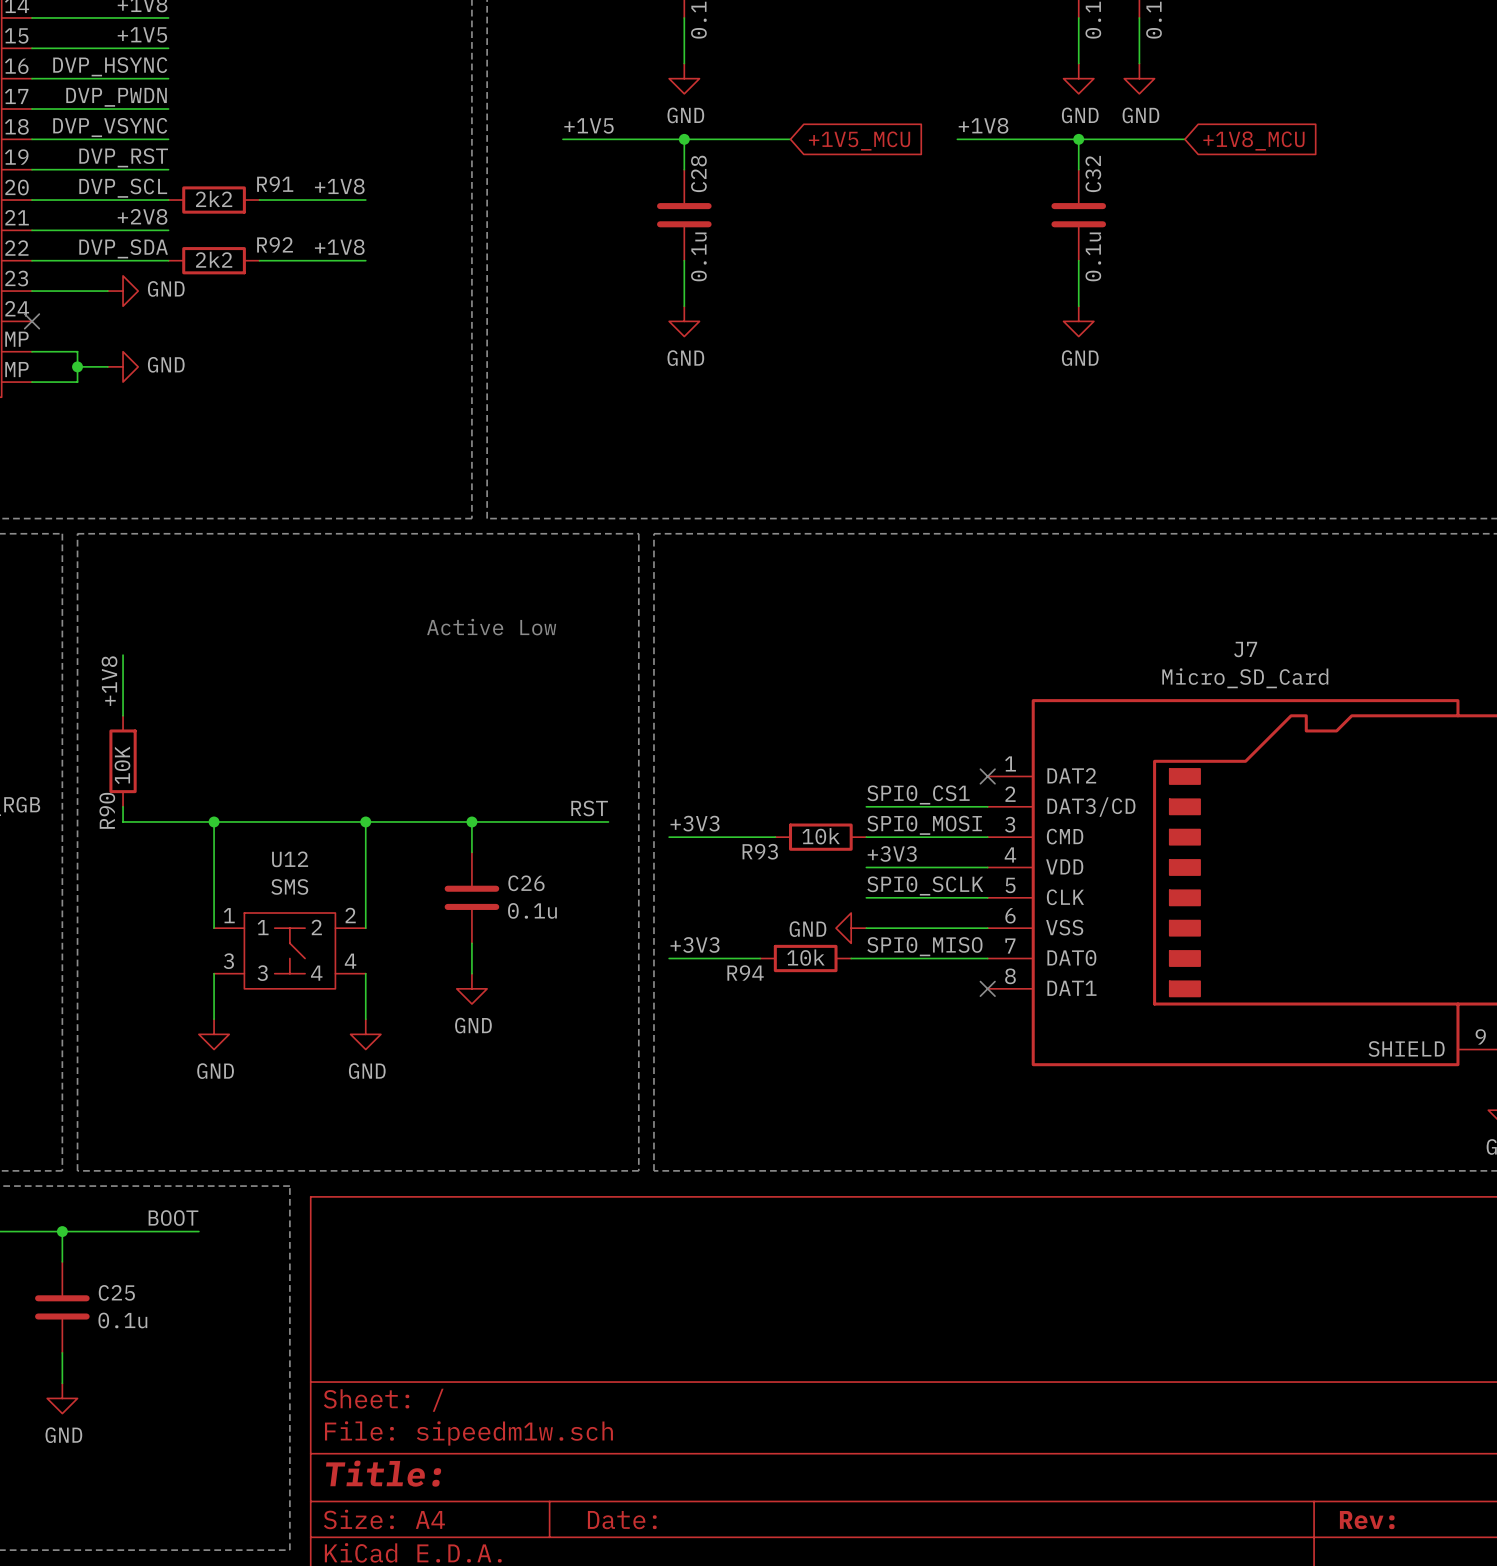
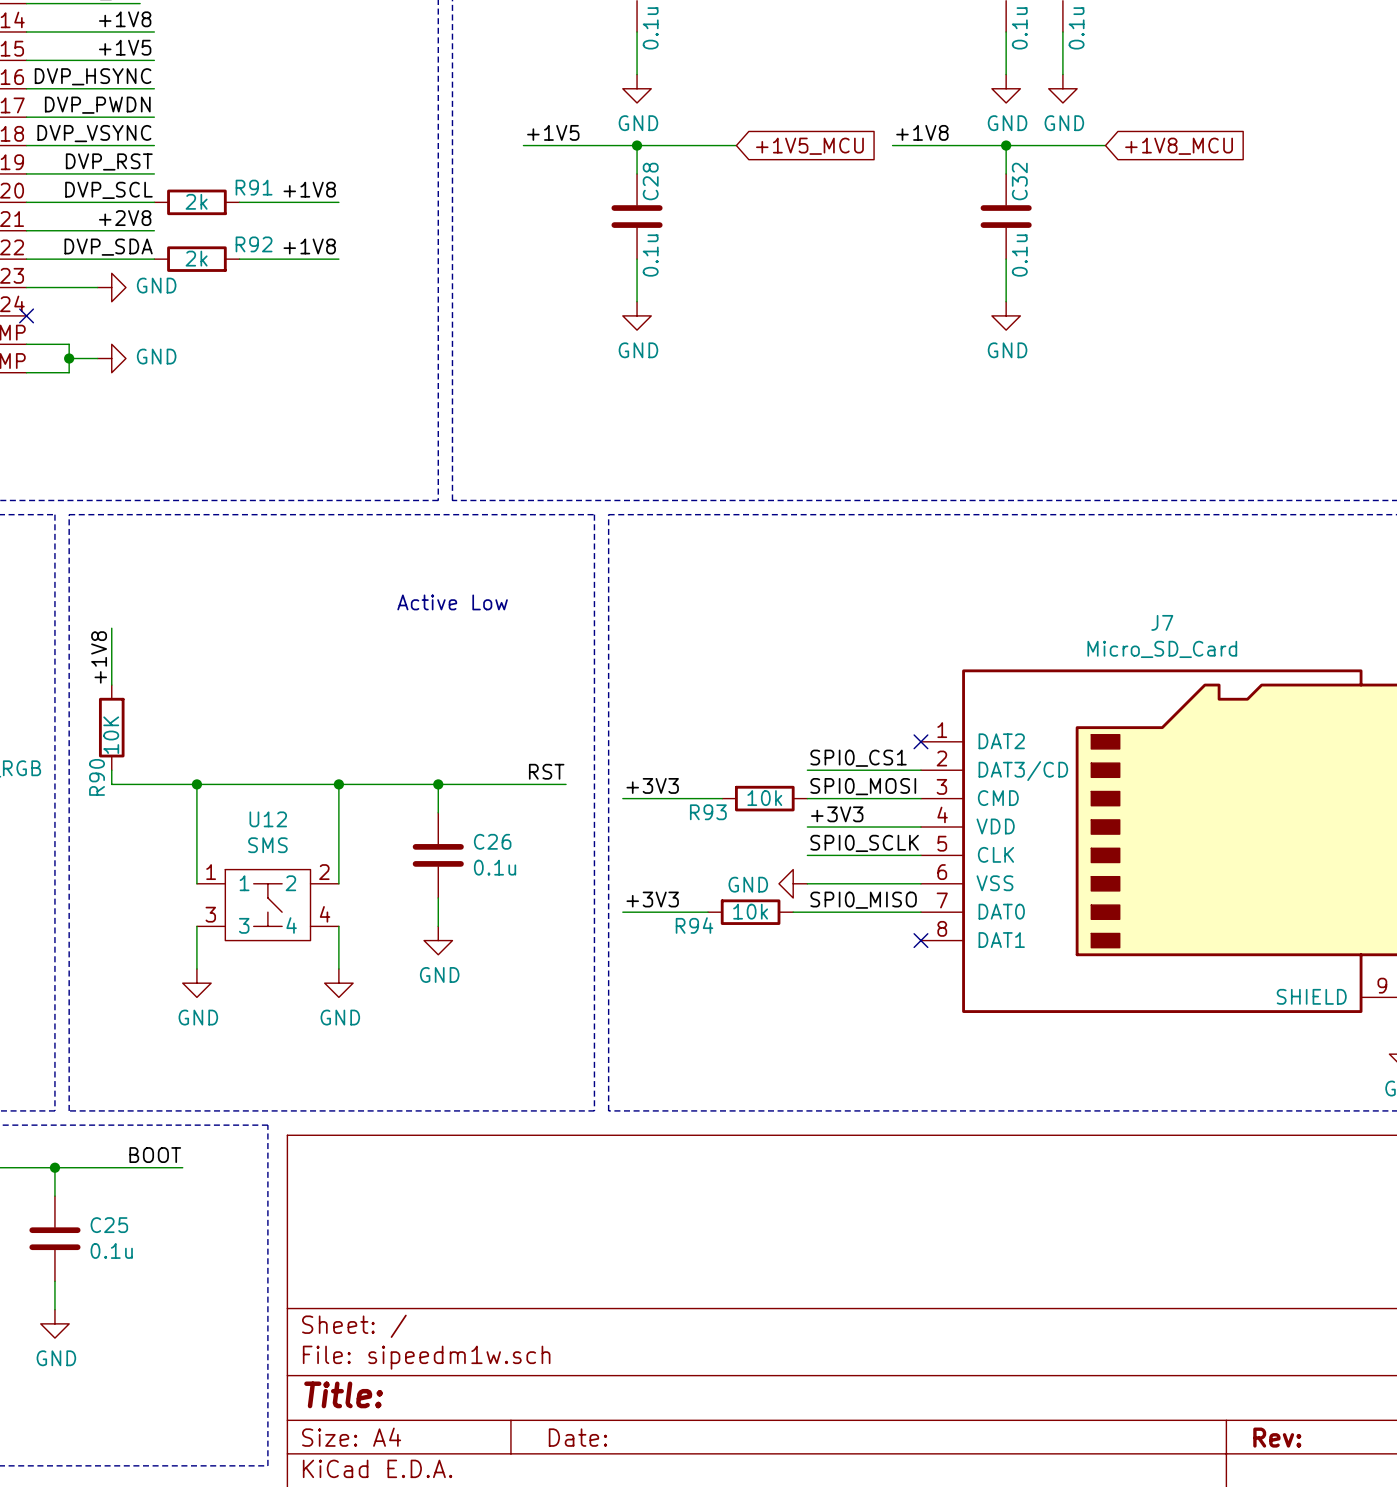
R91 value: 2k2 (214, 199) -> 2k (196, 201)
R92 value: 2k2 (214, 259) -> 2k (196, 258)

